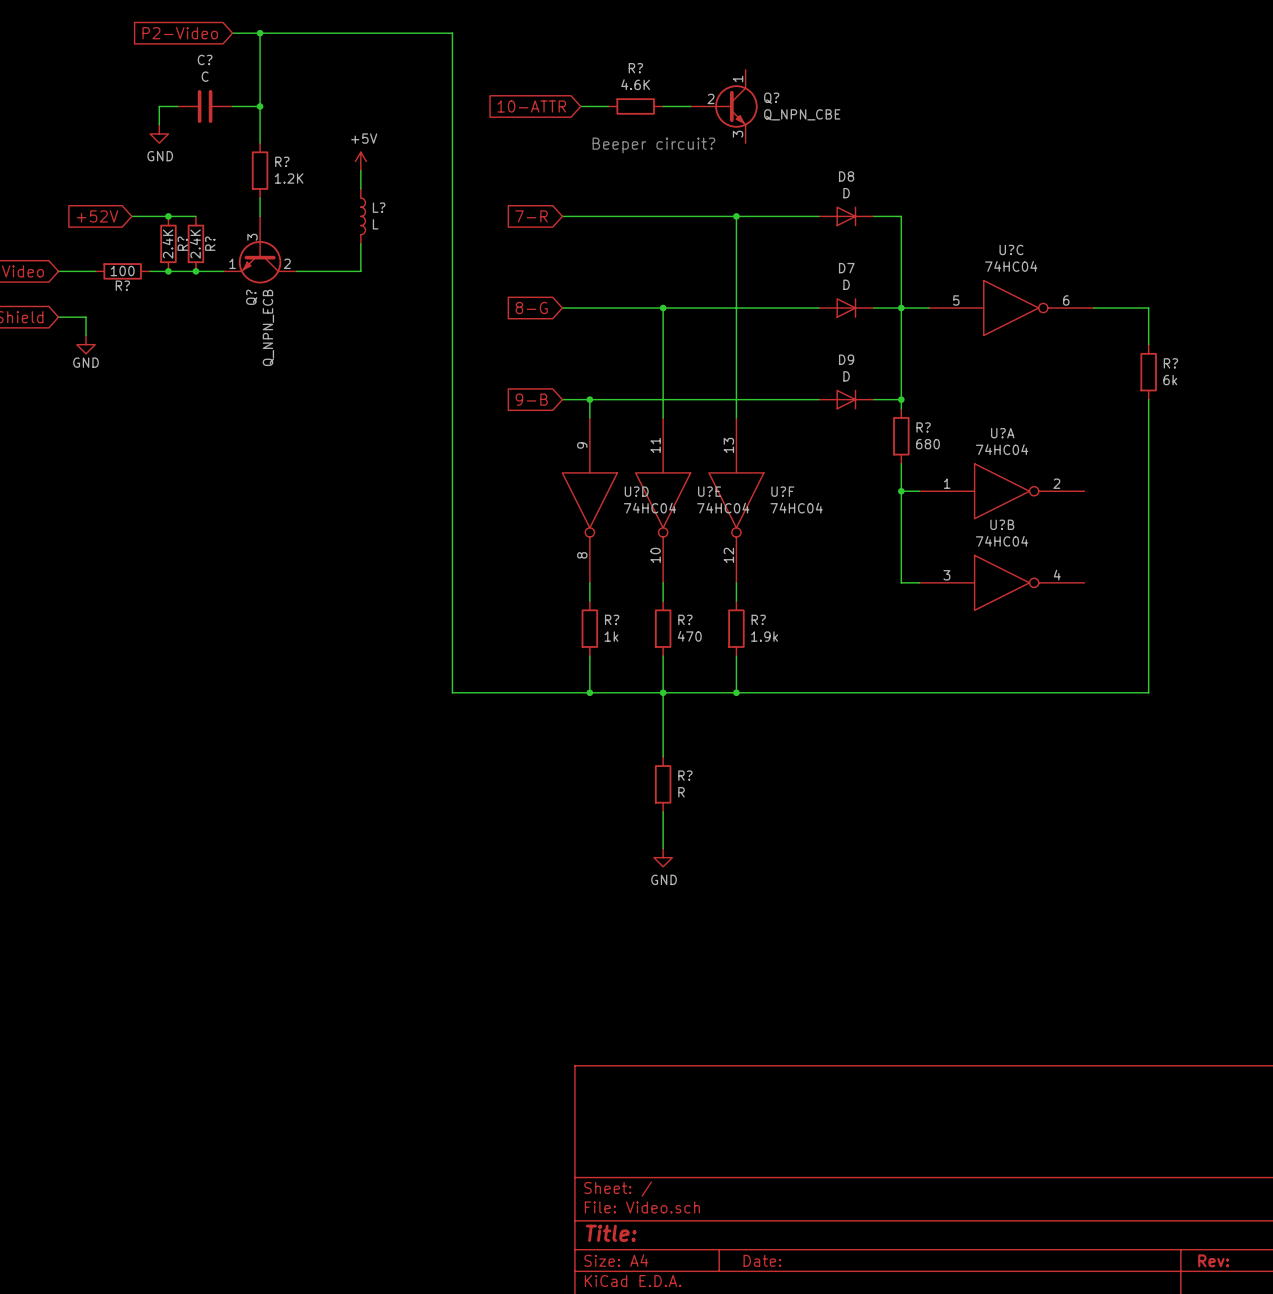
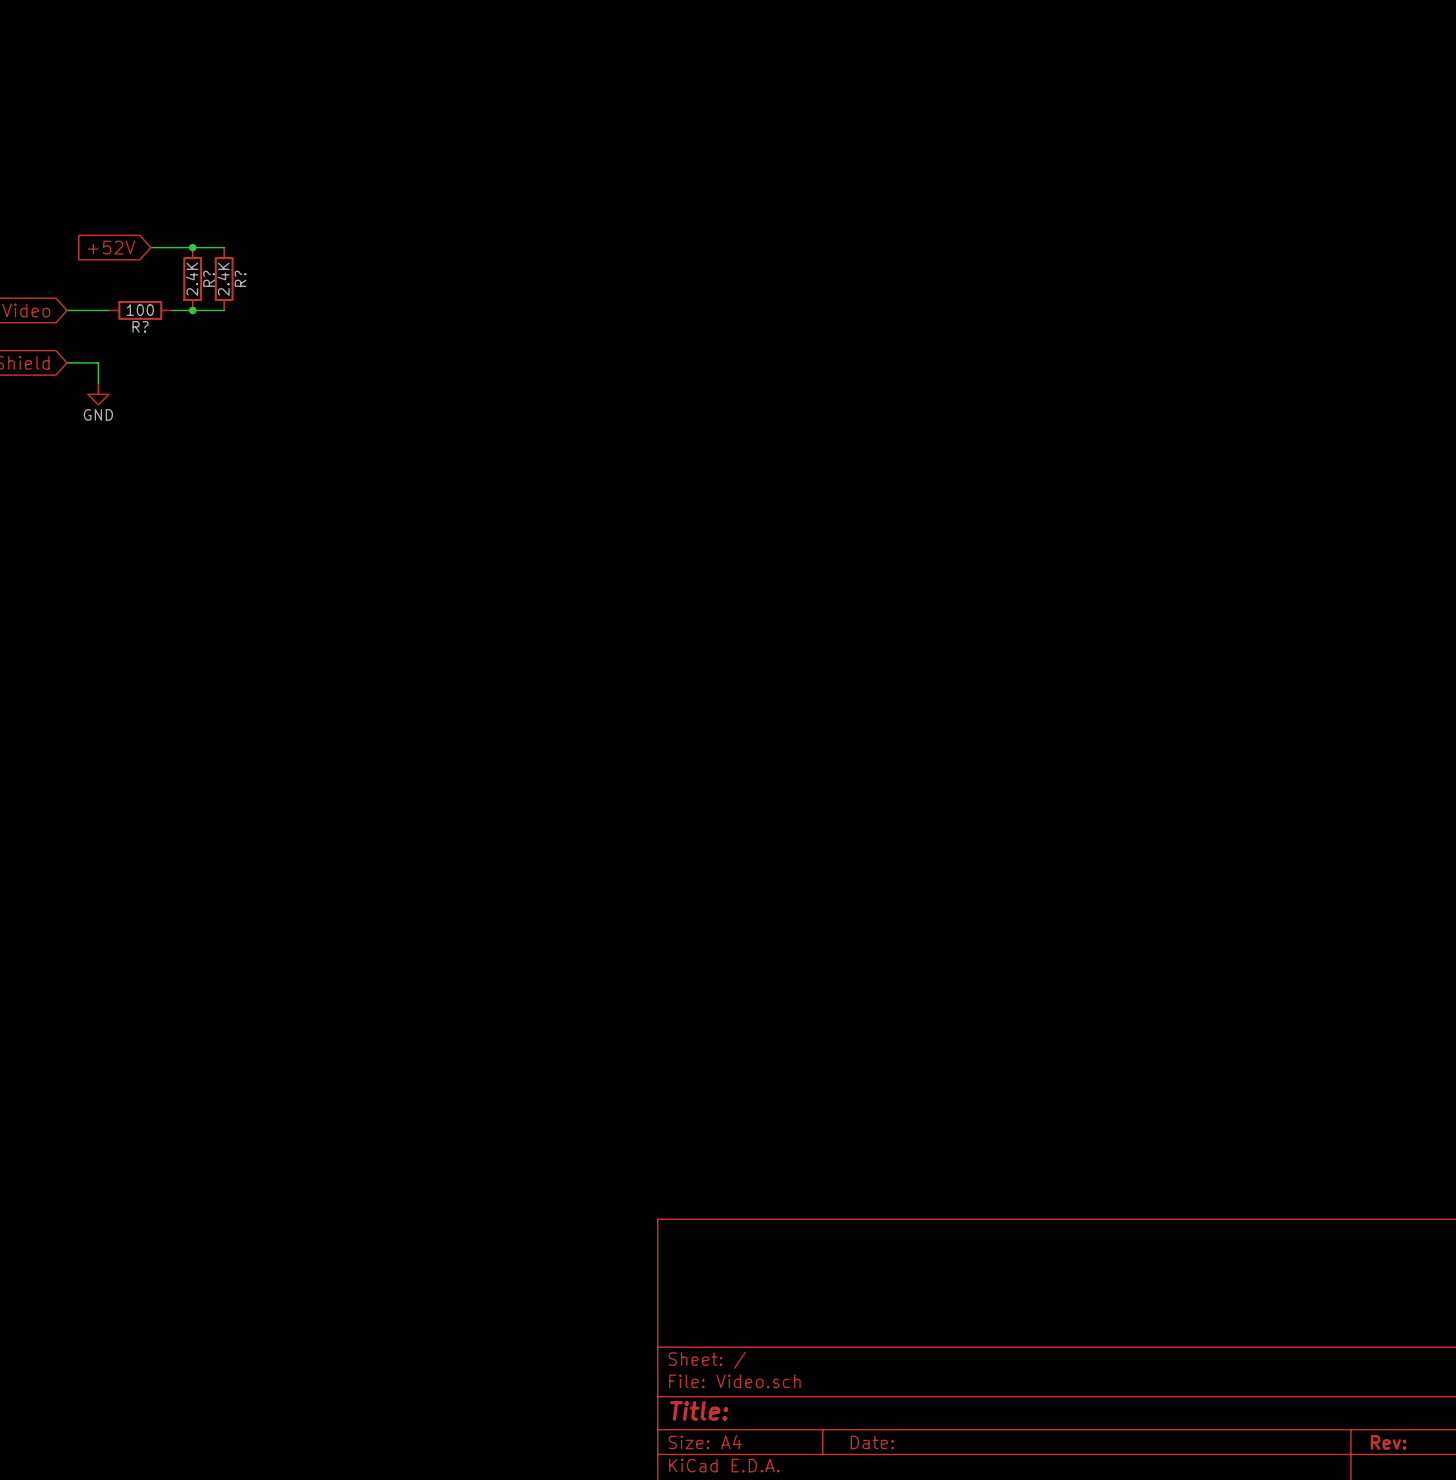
global label: P2-Video (180, 33) -> none
wire: (232, 33) (452, 33) (452, 692) (1148, 692) (1148, 399) -> none
wire: (260, 33) (260, 143) -> none
junction: (260, 33) -> none
wire: (177, 106) (159, 106) (159, 124) -> none
C?: C (205, 106) -> none
wire: (232, 106) (260, 106) -> none
junction: (260, 106) -> none
global label: 10-ATTR (531, 106) -> none
wire: (580, 106) (608, 106) -> none
R?: 4.6K (635, 106) -> none
wire: (663, 106) (690, 106) -> none
Q?: Q_NPN_CBE (724, 106) -> none
power symbol: GND (159, 133) -> none
text: Beeper circuit? (653, 145) -> none
power symbol: +5V (360, 161) -> none
R?: 1.2K (260, 170) -> none
wire: (360, 170) (360, 188) -> none
wire: (260, 198) (260, 216) -> none
L?: L (363, 216) -> none
global label: 7-R (531, 216) -> none
wire: (562, 216) (818, 216) -> none
wire: (736, 216) (736, 417) -> none
junction: (736, 216) -> none
D8: D (846, 216) -> none
wire: (873, 216) (901, 216) (901, 408) -> none
wire: (360, 243) (360, 271) (296, 271) -> none
Q?: Q_NPN_ECB (260, 249) -> none
wire: (195, 271) (223, 271) -> none
junction: (195, 271) -> none
global label: 8-G (531, 308) -> none
wire: (562, 308) (818, 308) -> none
wire: (663, 308) (663, 417) -> none
junction: (663, 308) -> none
D7: D (846, 308) -> none
wire: (873, 308) (928, 308) -> none
junction: (901, 308) -> none
U?C: 74HC04 (1011, 308) -> none
wire: (1093, 308) (1148, 308) (1148, 344) -> none
R?: 6k (1148, 372) -> none
global label: 9-B (531, 399) -> none
wire: (562, 399) (818, 399) -> none
wire: (589, 399) (589, 417) -> none
junction: (589, 399) -> none
D9: D (846, 399) -> none
wire: (873, 399) (901, 399) -> none
junction: (901, 399) -> none
R?: 680 (901, 436) -> none
wire: (901, 463) (901, 582) (919, 582) -> none
wire: (901, 491) (919, 491) -> none
junction: (901, 491) -> none
U?A: 74HC04 (1002, 491) -> none
U?D: 74HC04 (589, 500) -> none
U?E: 74HC04 (663, 500) -> none
U?F: 74HC04 (736, 500) -> none
wire: (589, 582) (589, 601) -> none
wire: (663, 582) (663, 601) -> none
wire: (736, 582) (736, 601) -> none
U?B: 74HC04 (1002, 582) -> none
R?: 1k (589, 628) -> none
R?: 470 (663, 628) -> none
R?: 1.9k (736, 628) -> none
wire: (589, 656) (589, 692) -> none
wire: (663, 656) (663, 756) -> none
wire: (736, 656) (736, 692) -> none
junction: (589, 692) -> none
junction: (663, 692) -> none
junction: (736, 692) -> none
R?: R (663, 784) -> none
wire: (663, 811) (663, 848) -> none
power symbol: GND (663, 857) -> none

